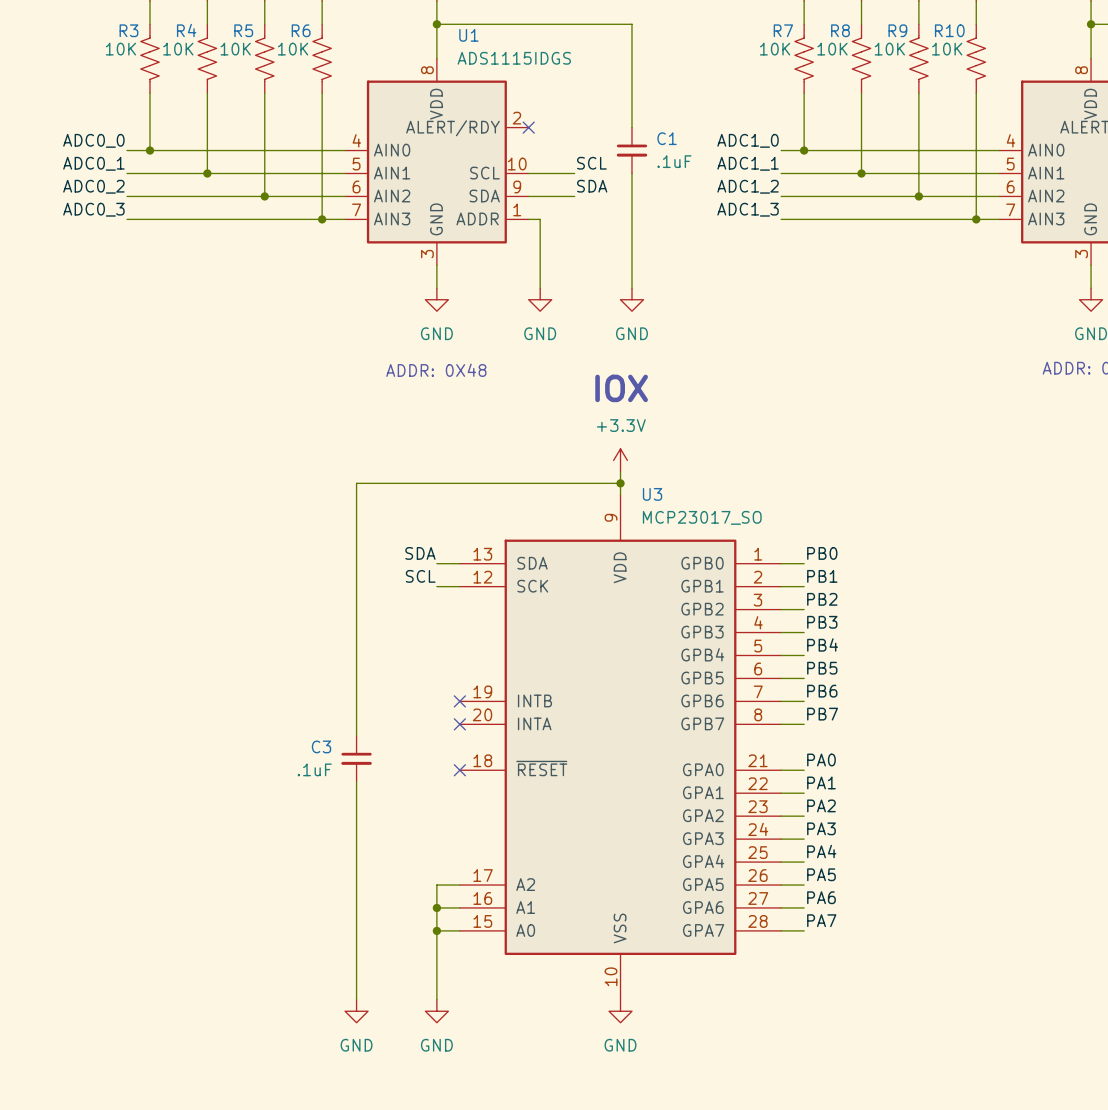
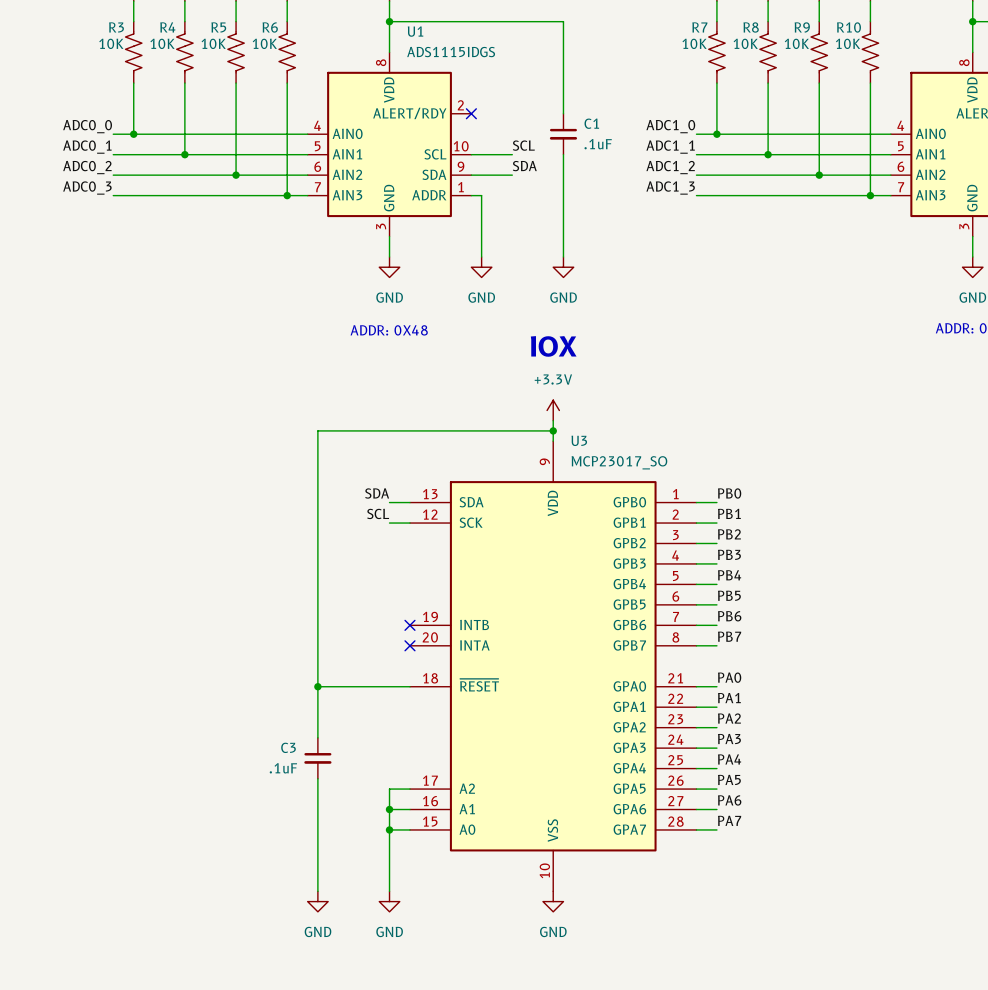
C3 position: (356, 758) -> (317, 758)
wire: none -> (317, 686) (409, 686)
junction: none -> (317, 686)
no-connect mark: (459, 770) -> none

